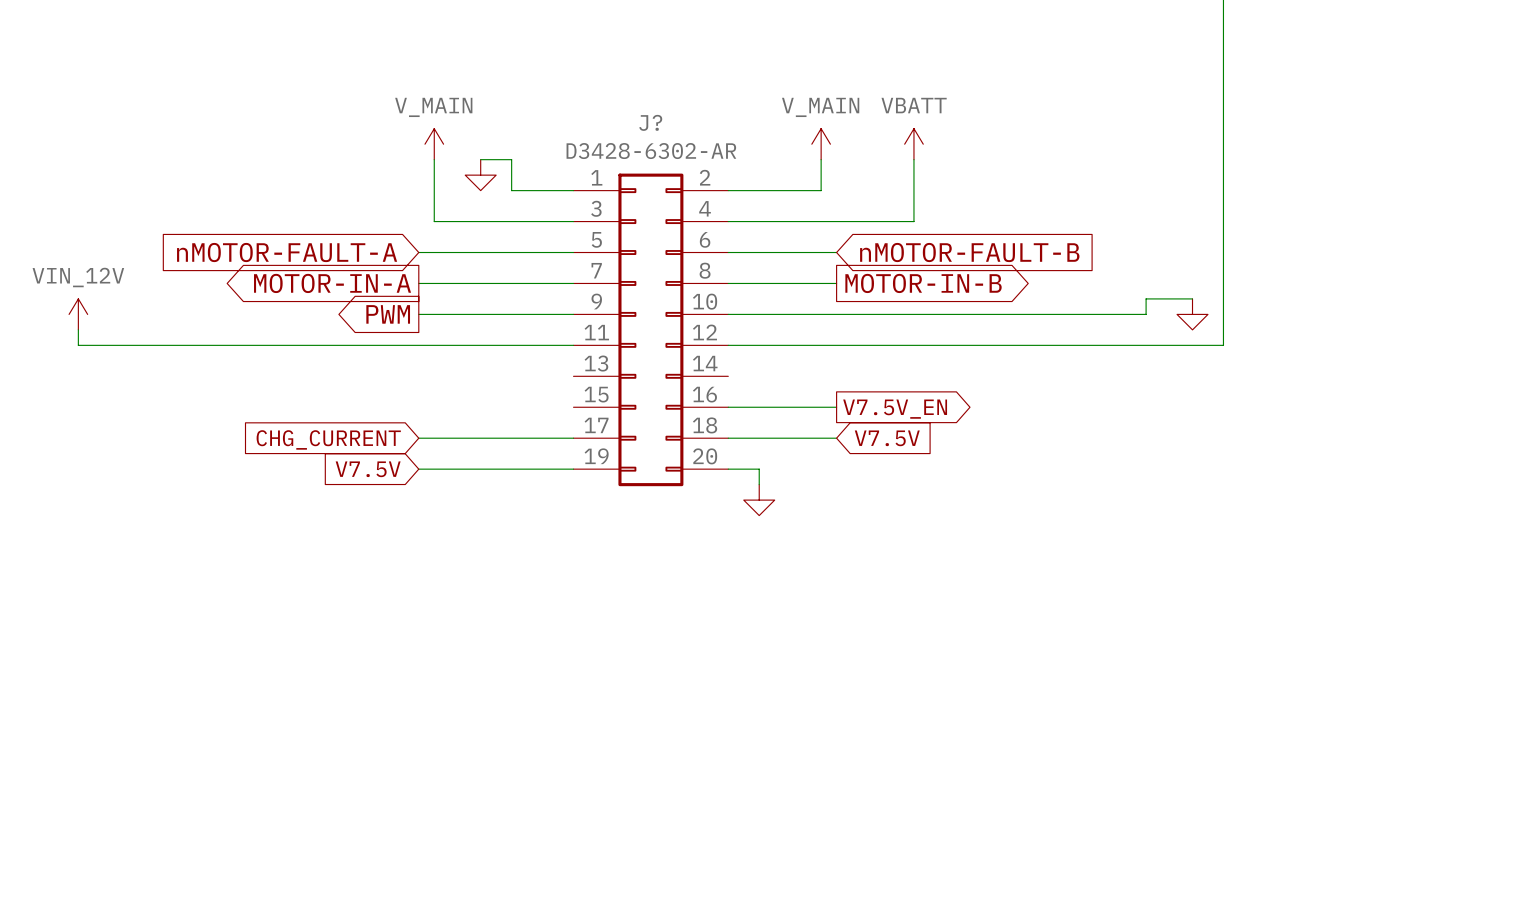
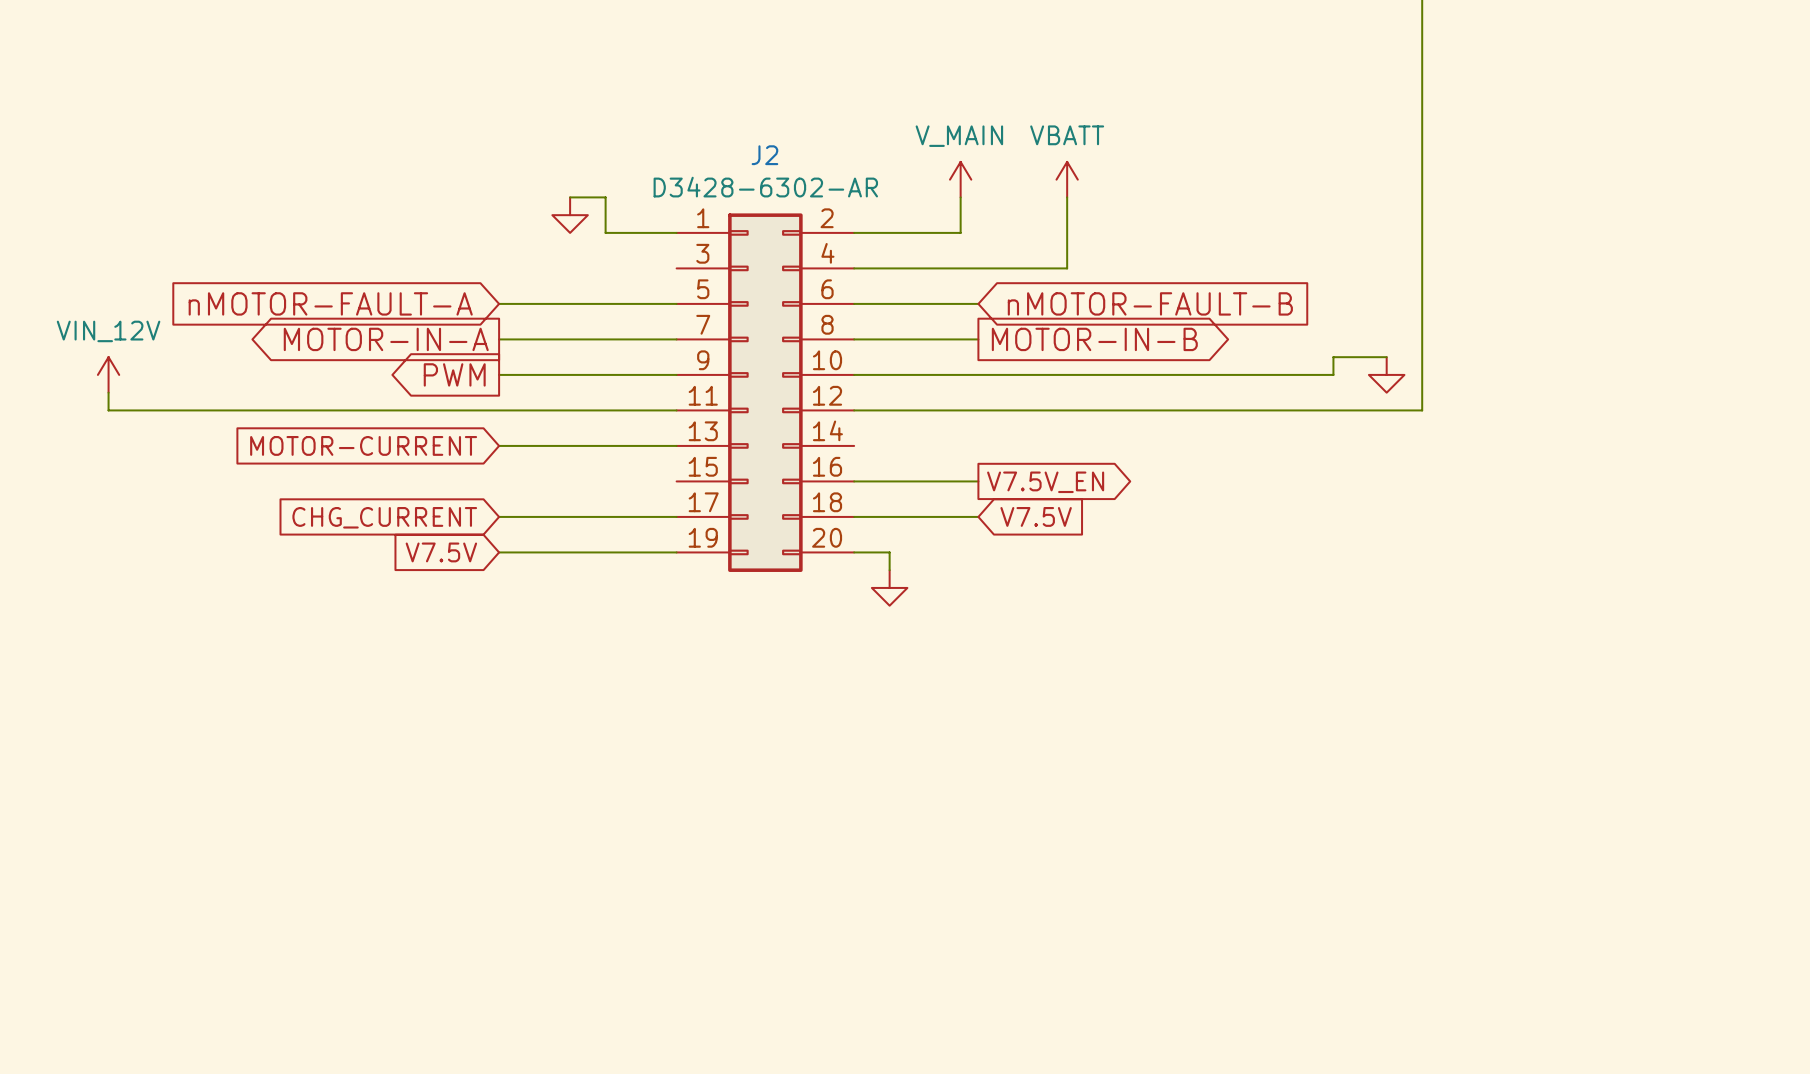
J? name: J? (650, 122) -> J2 (764, 155)
power symbol: V_MAIN (434, 144) -> none
wire: (434, 159) (434, 221) (573, 221) -> none
global label: none -> MOTOR-CURRENT (363, 445)
wire: none -> (499, 445) (676, 445)

